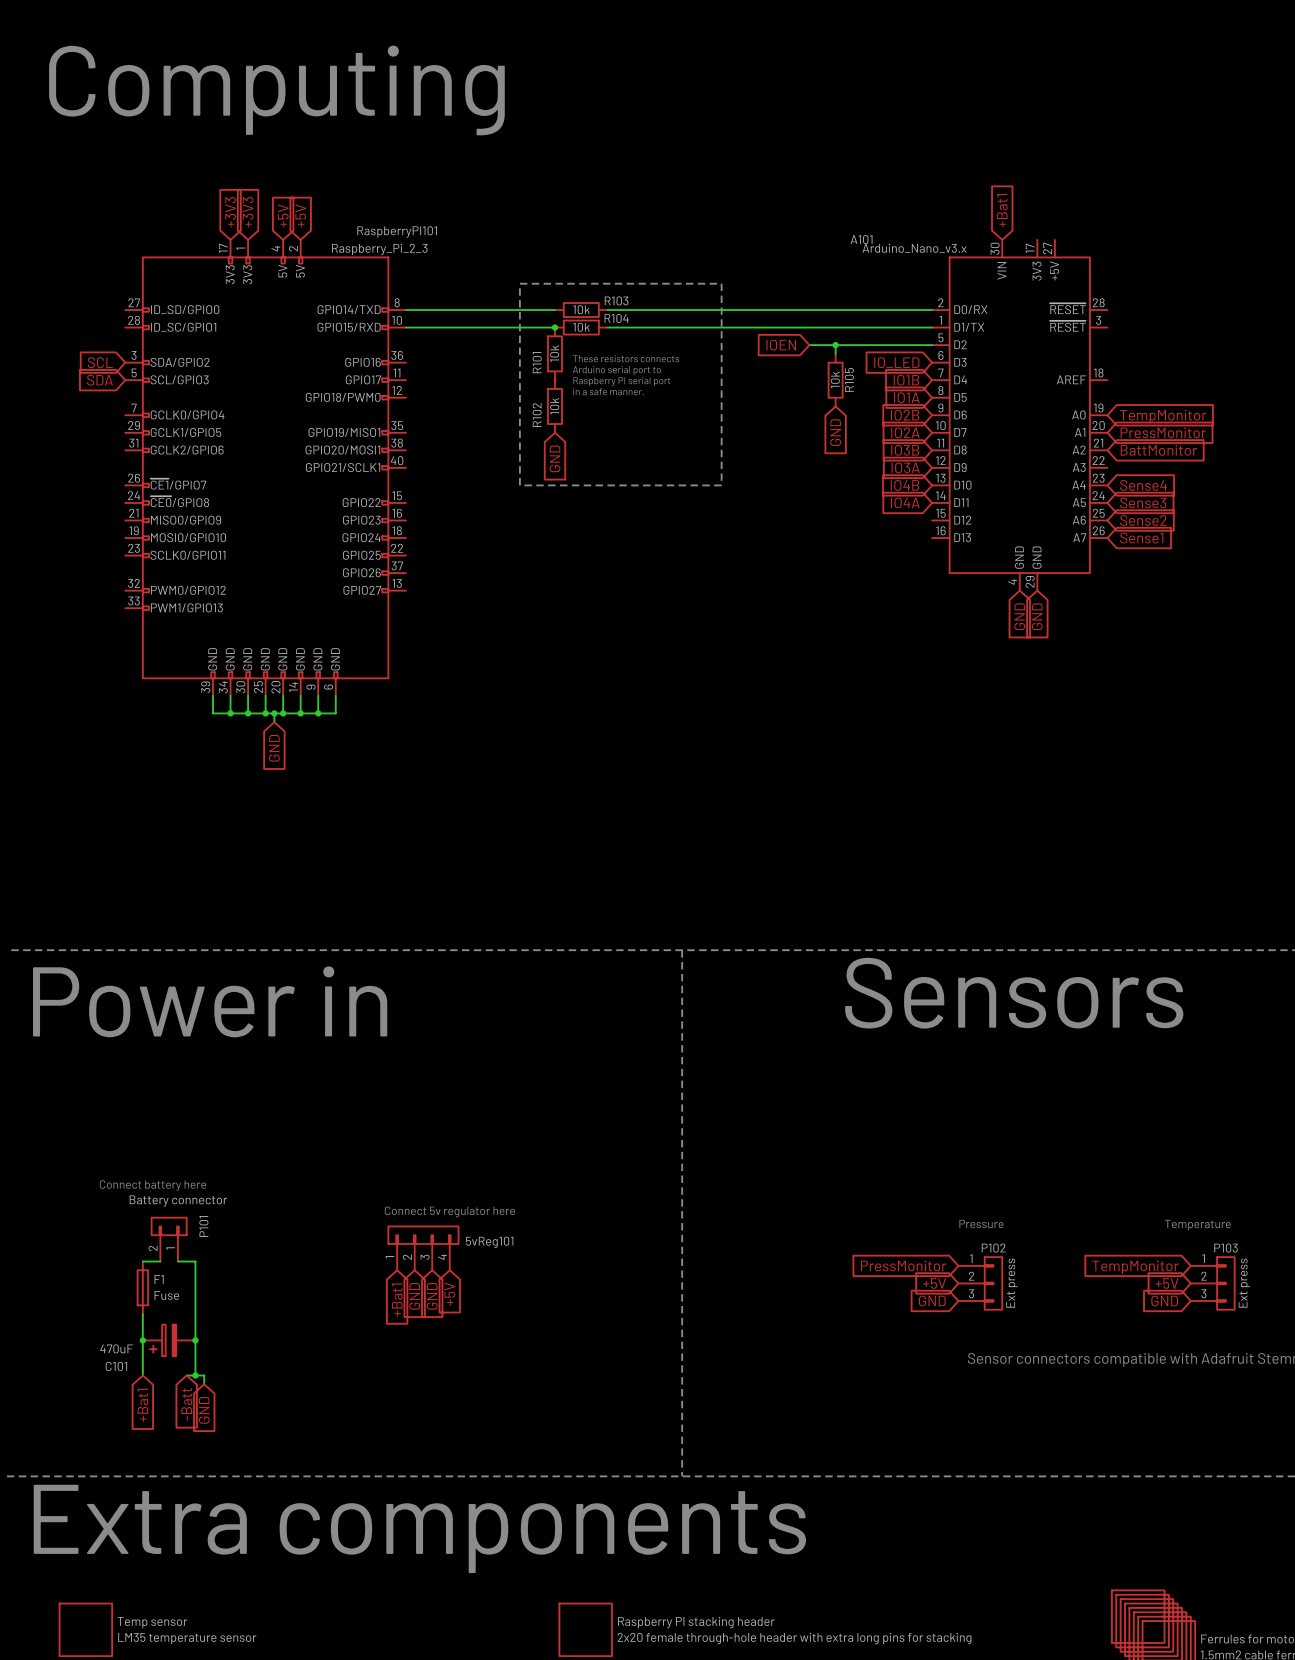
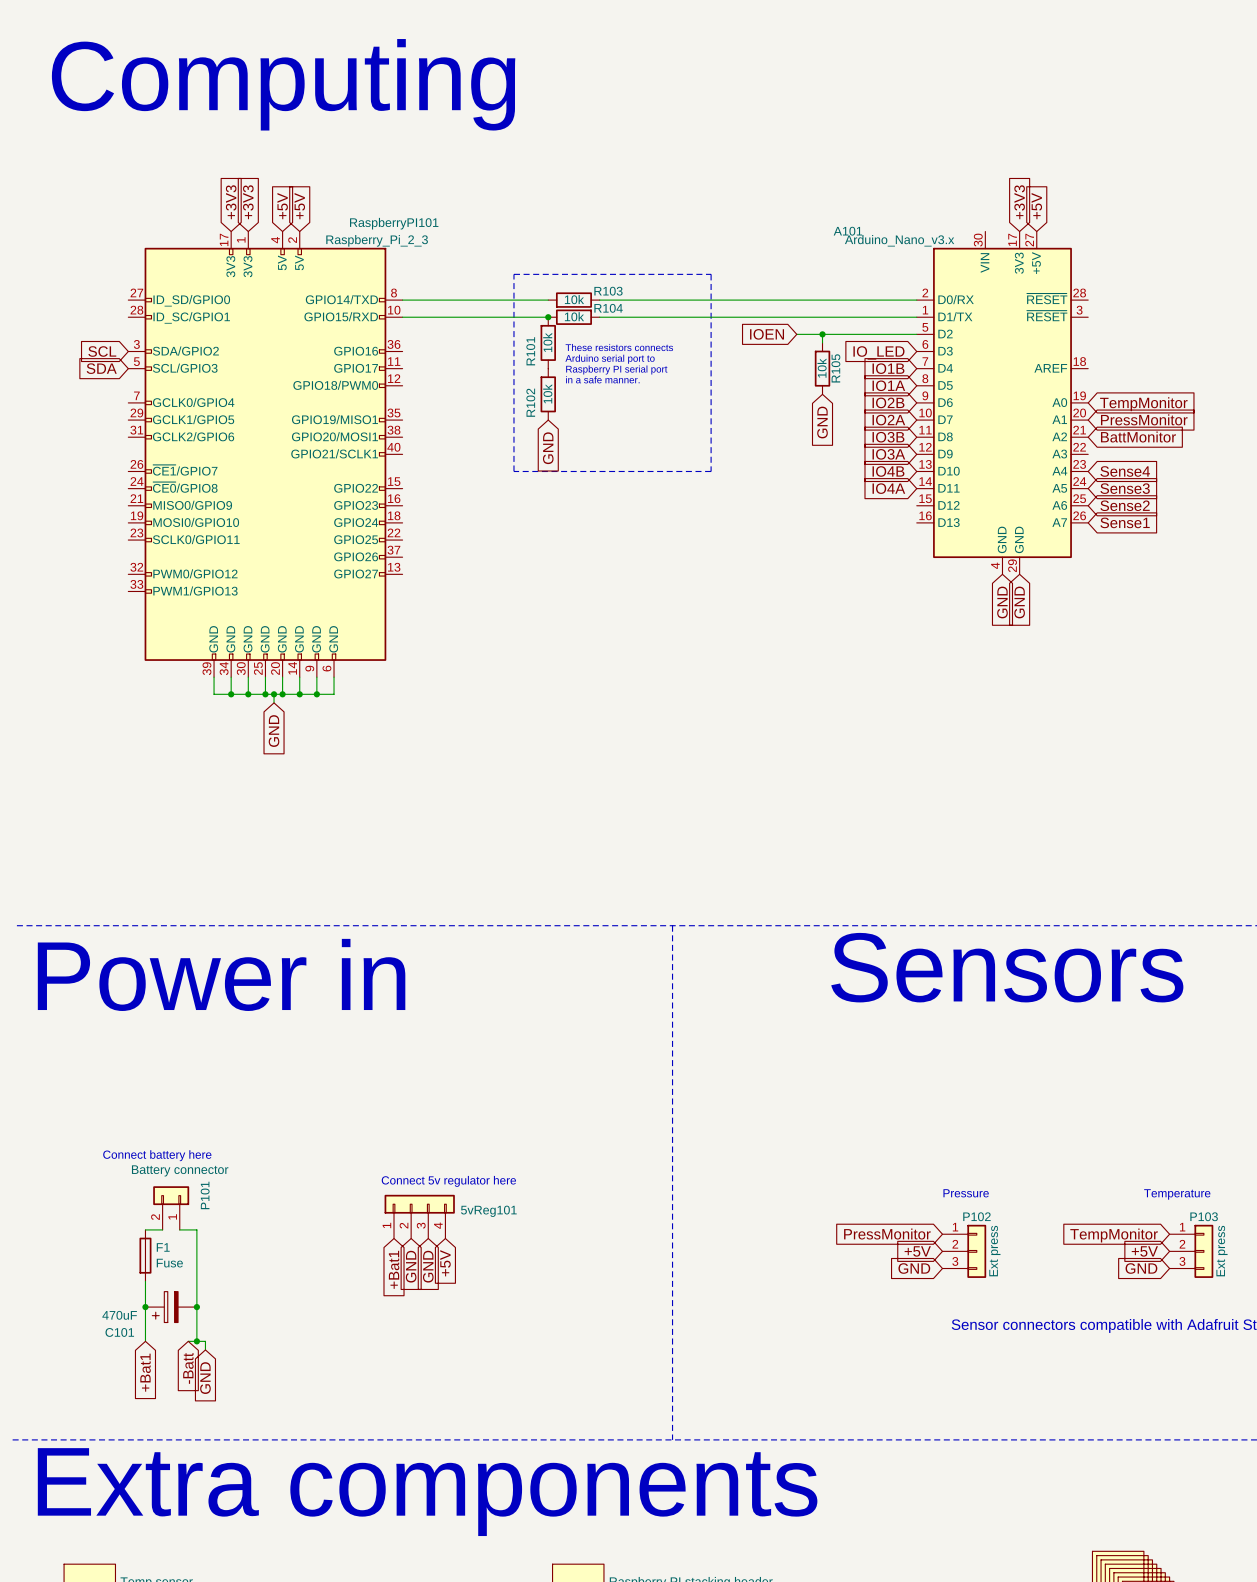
global label: +Bat1 (1002, 210) -> none
global label: none -> +3V3 (1019, 202)
global label: none -> +5V (1036, 206)

